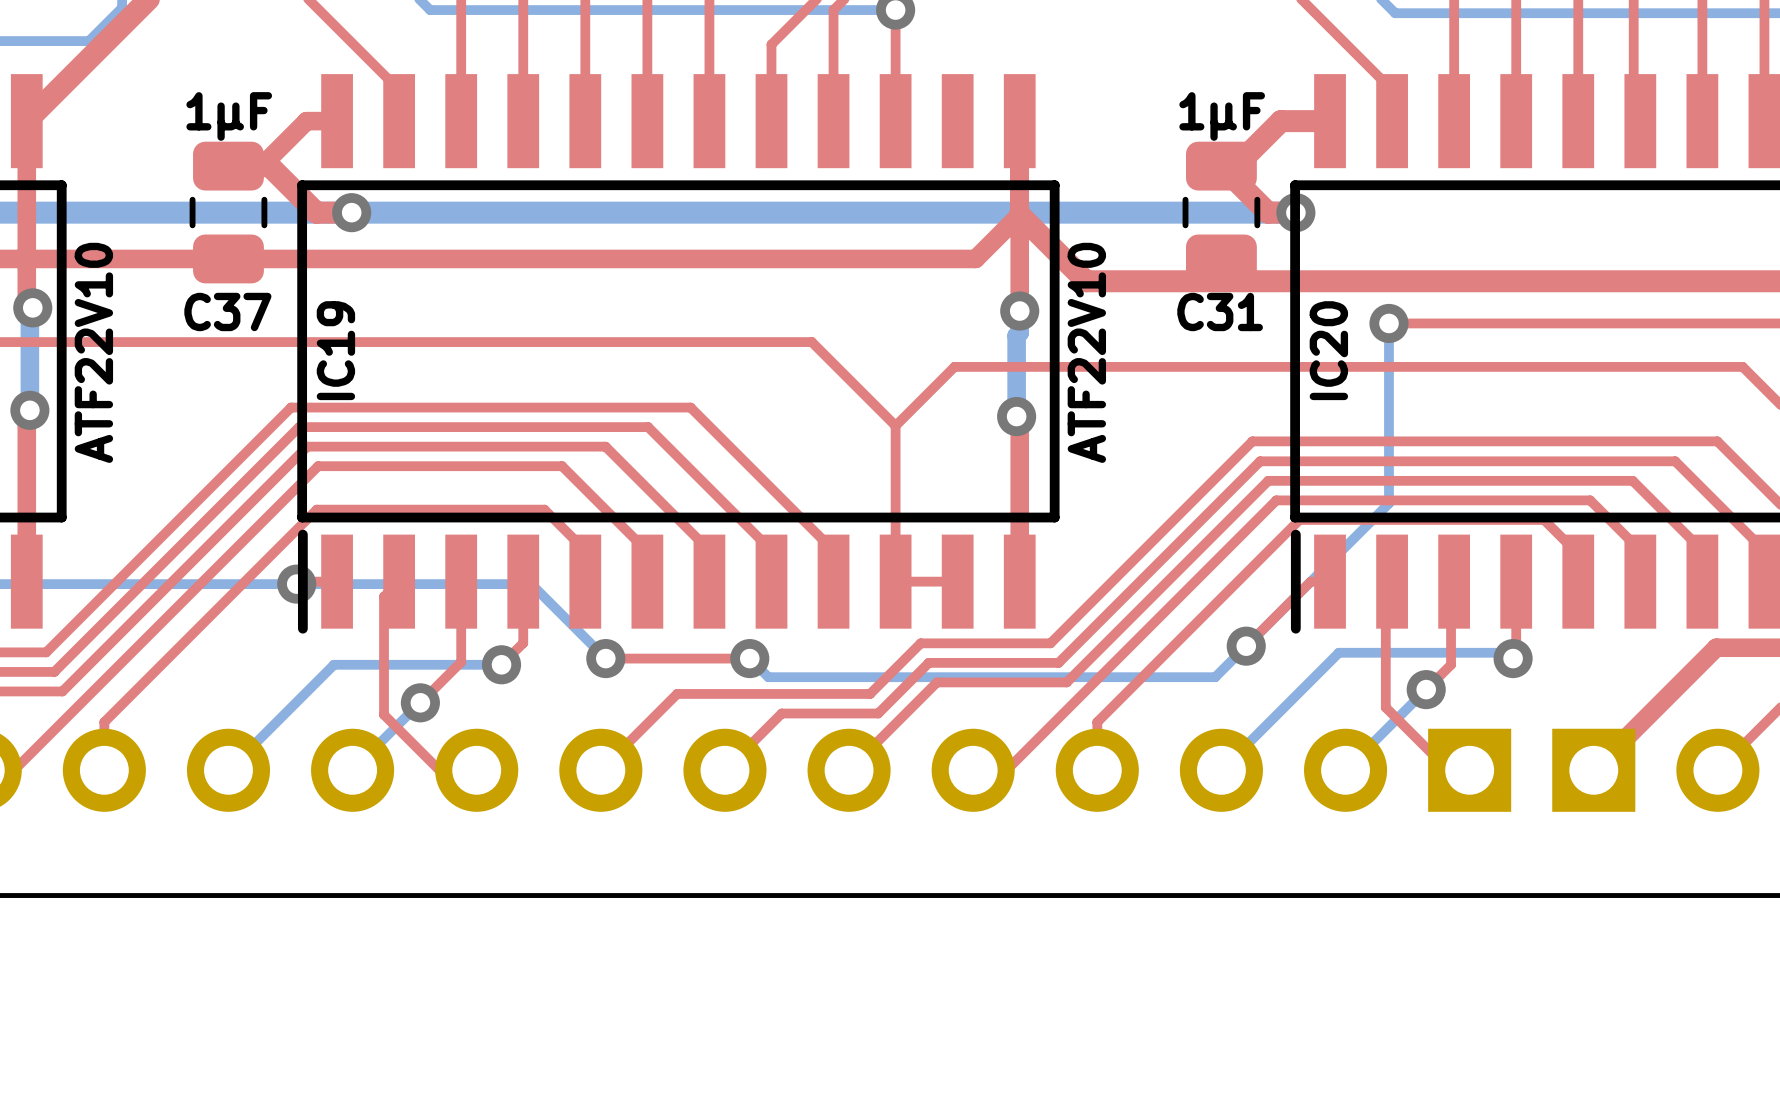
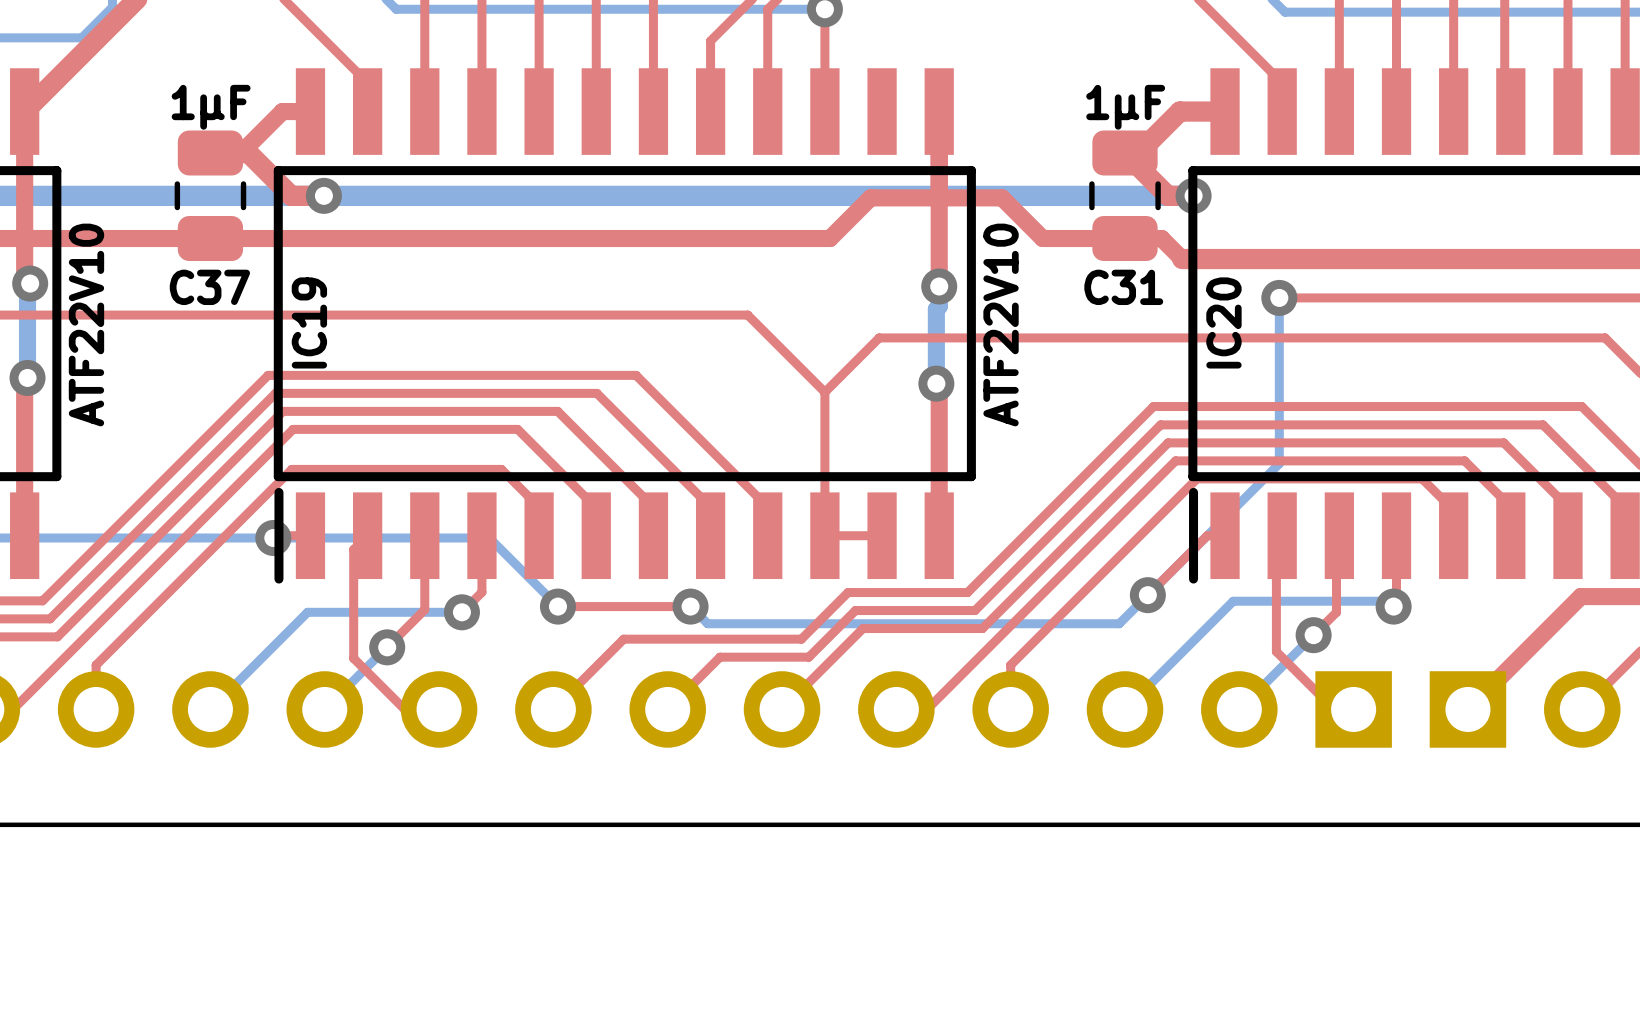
top track: (901, 258) (975, 258) (1019, 214) (1086, 281) (1283, 281) -> (830, 238) (870, 197) (1002, 197) (1042, 238) (1161, 238) (1182, 259)

